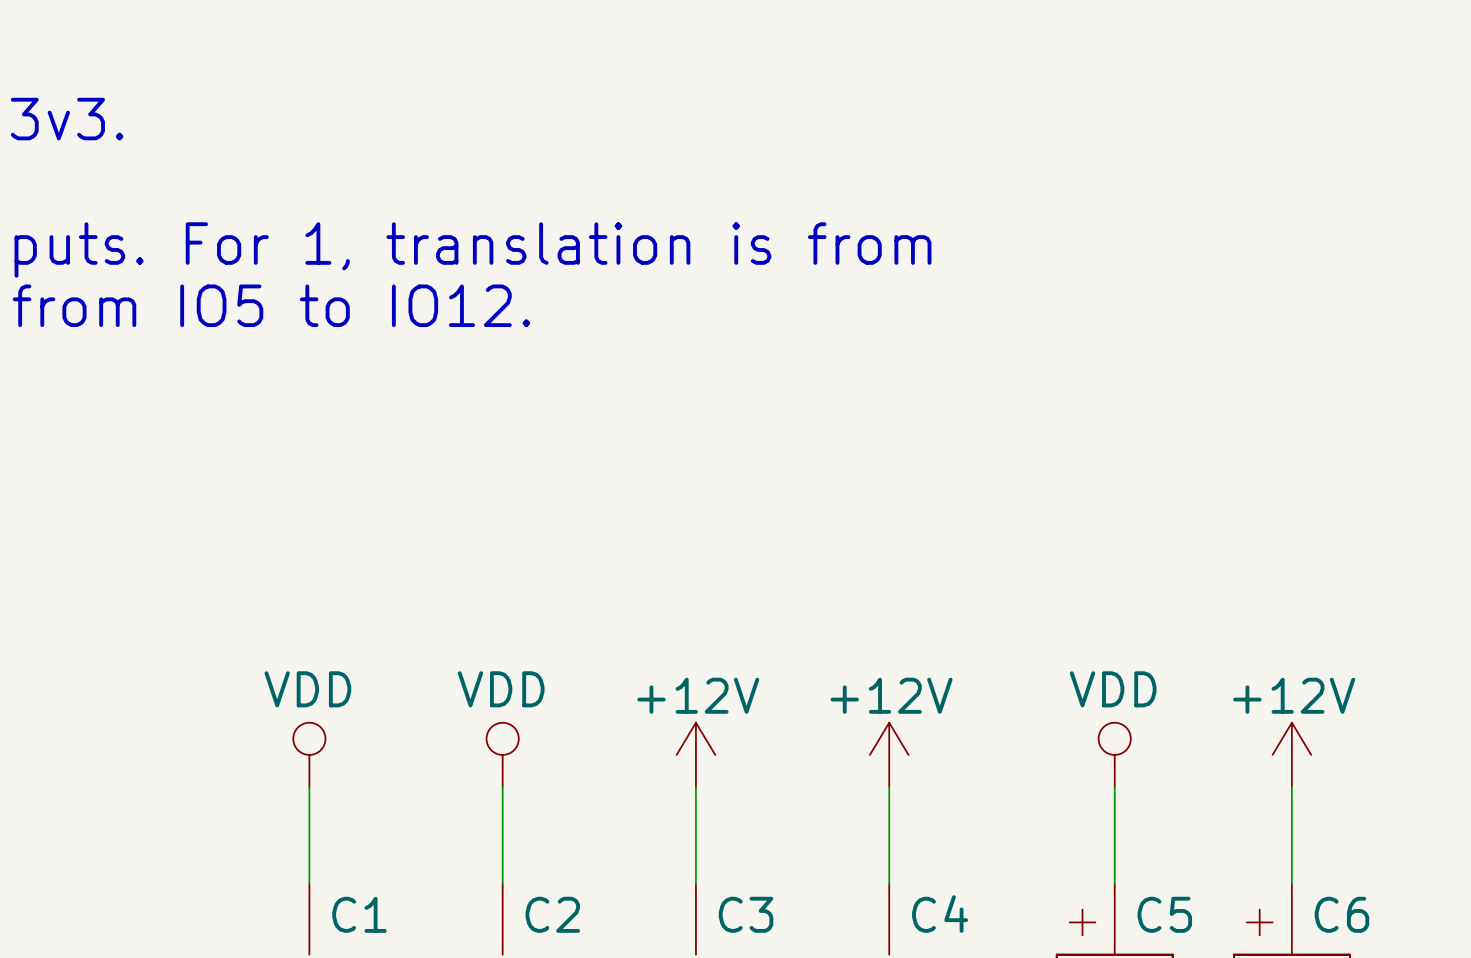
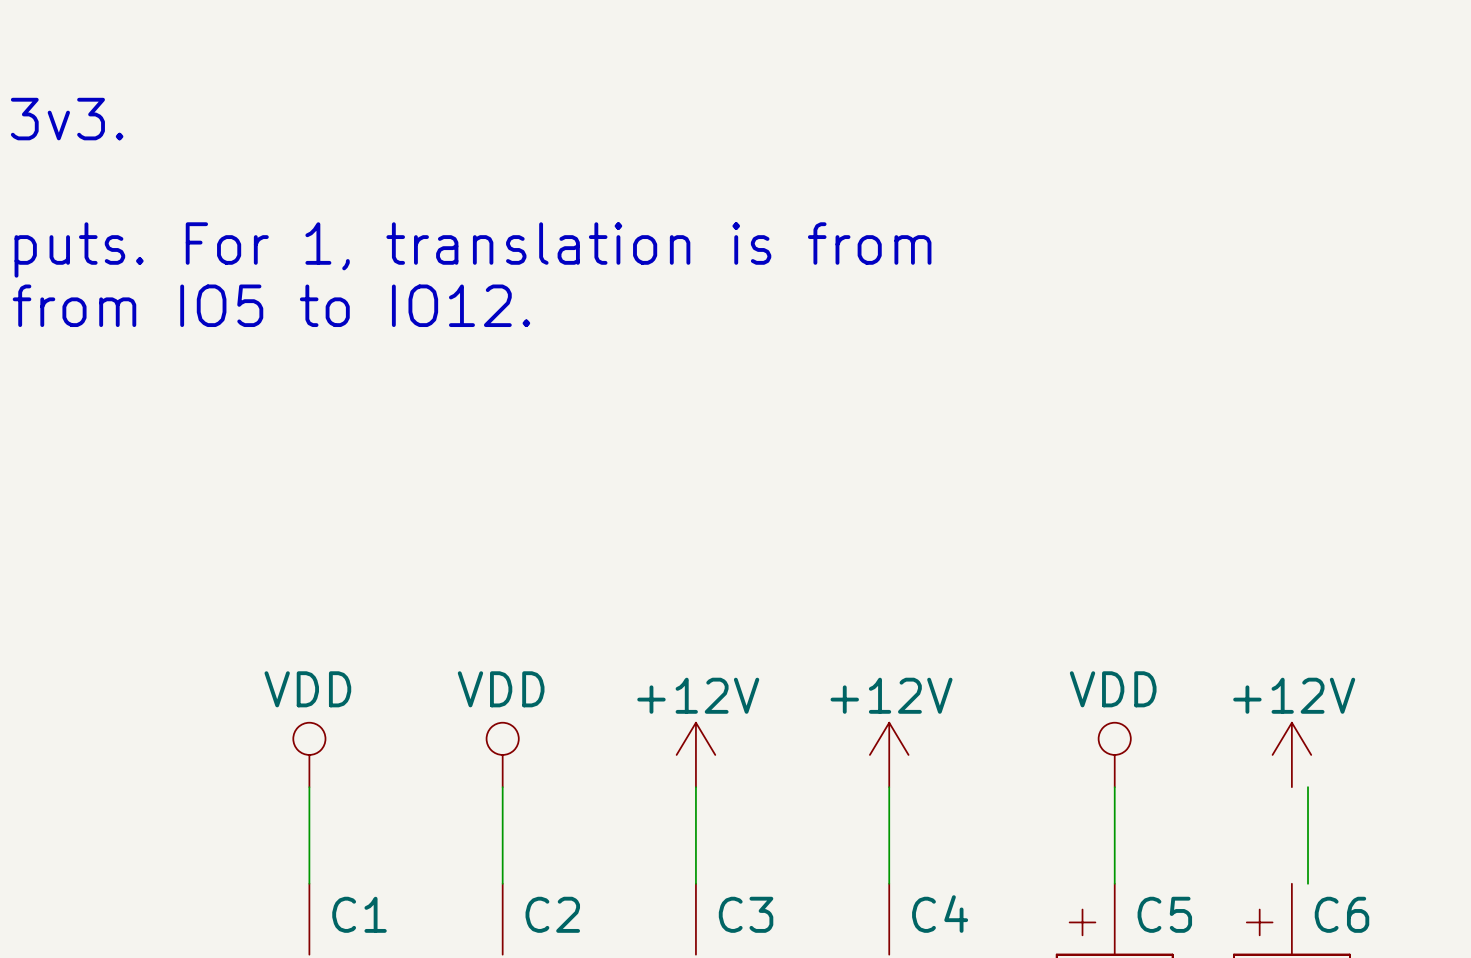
wire: (1291, 787) (1291, 883) -> (1308, 787) (1308, 883)

